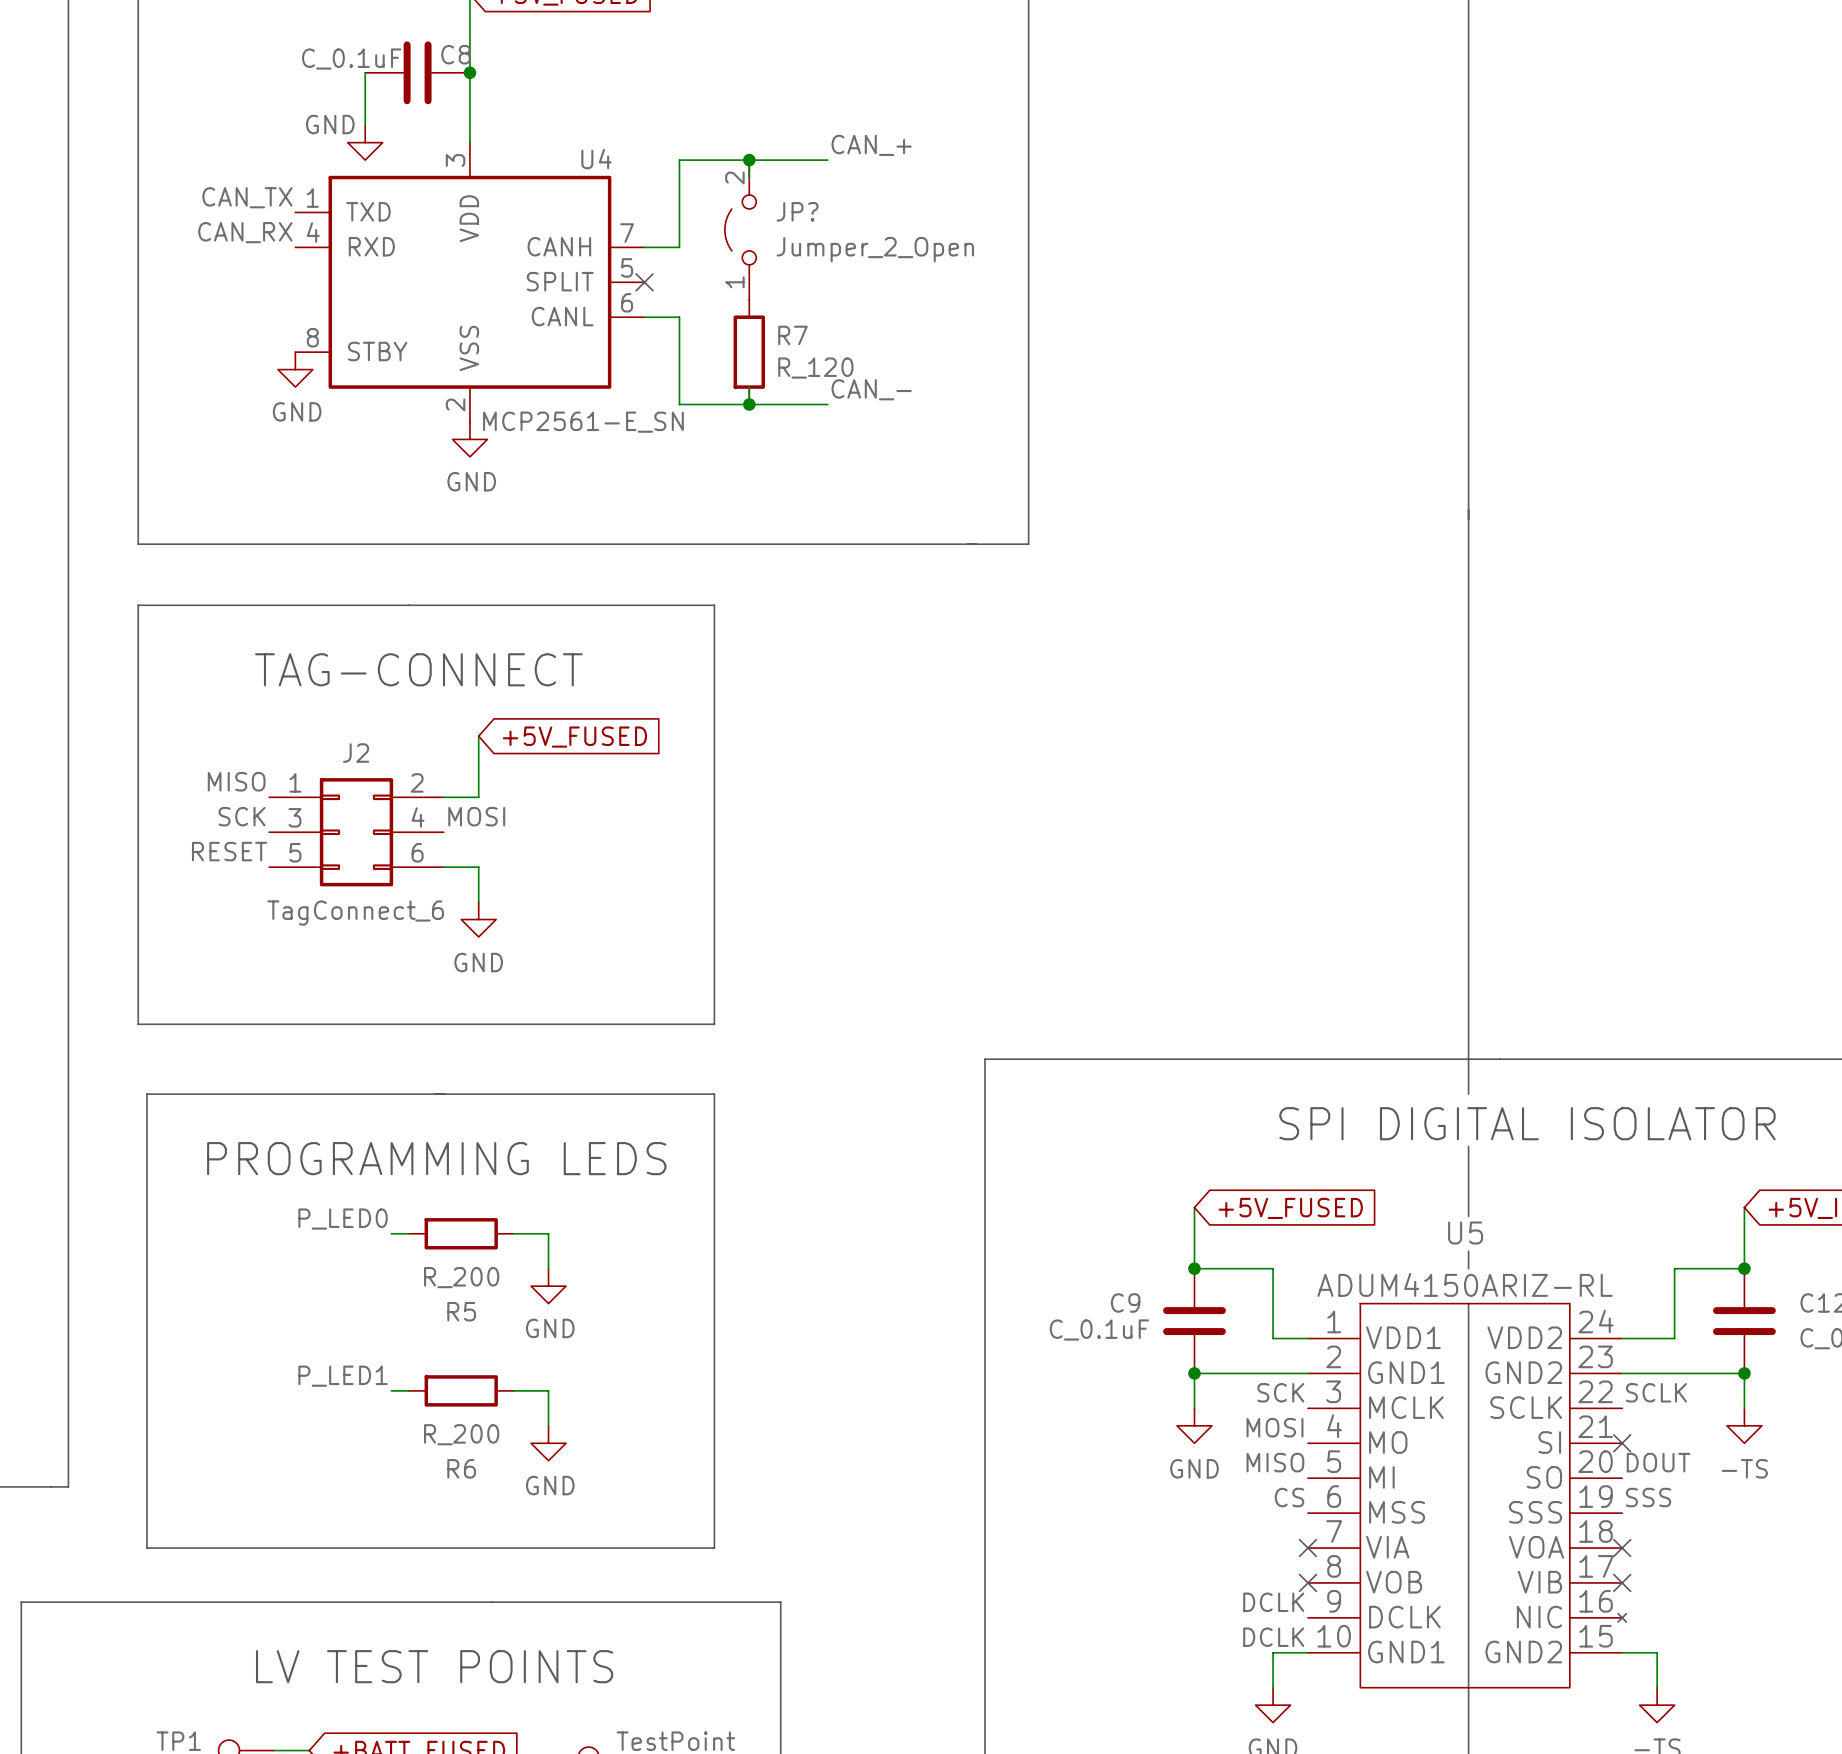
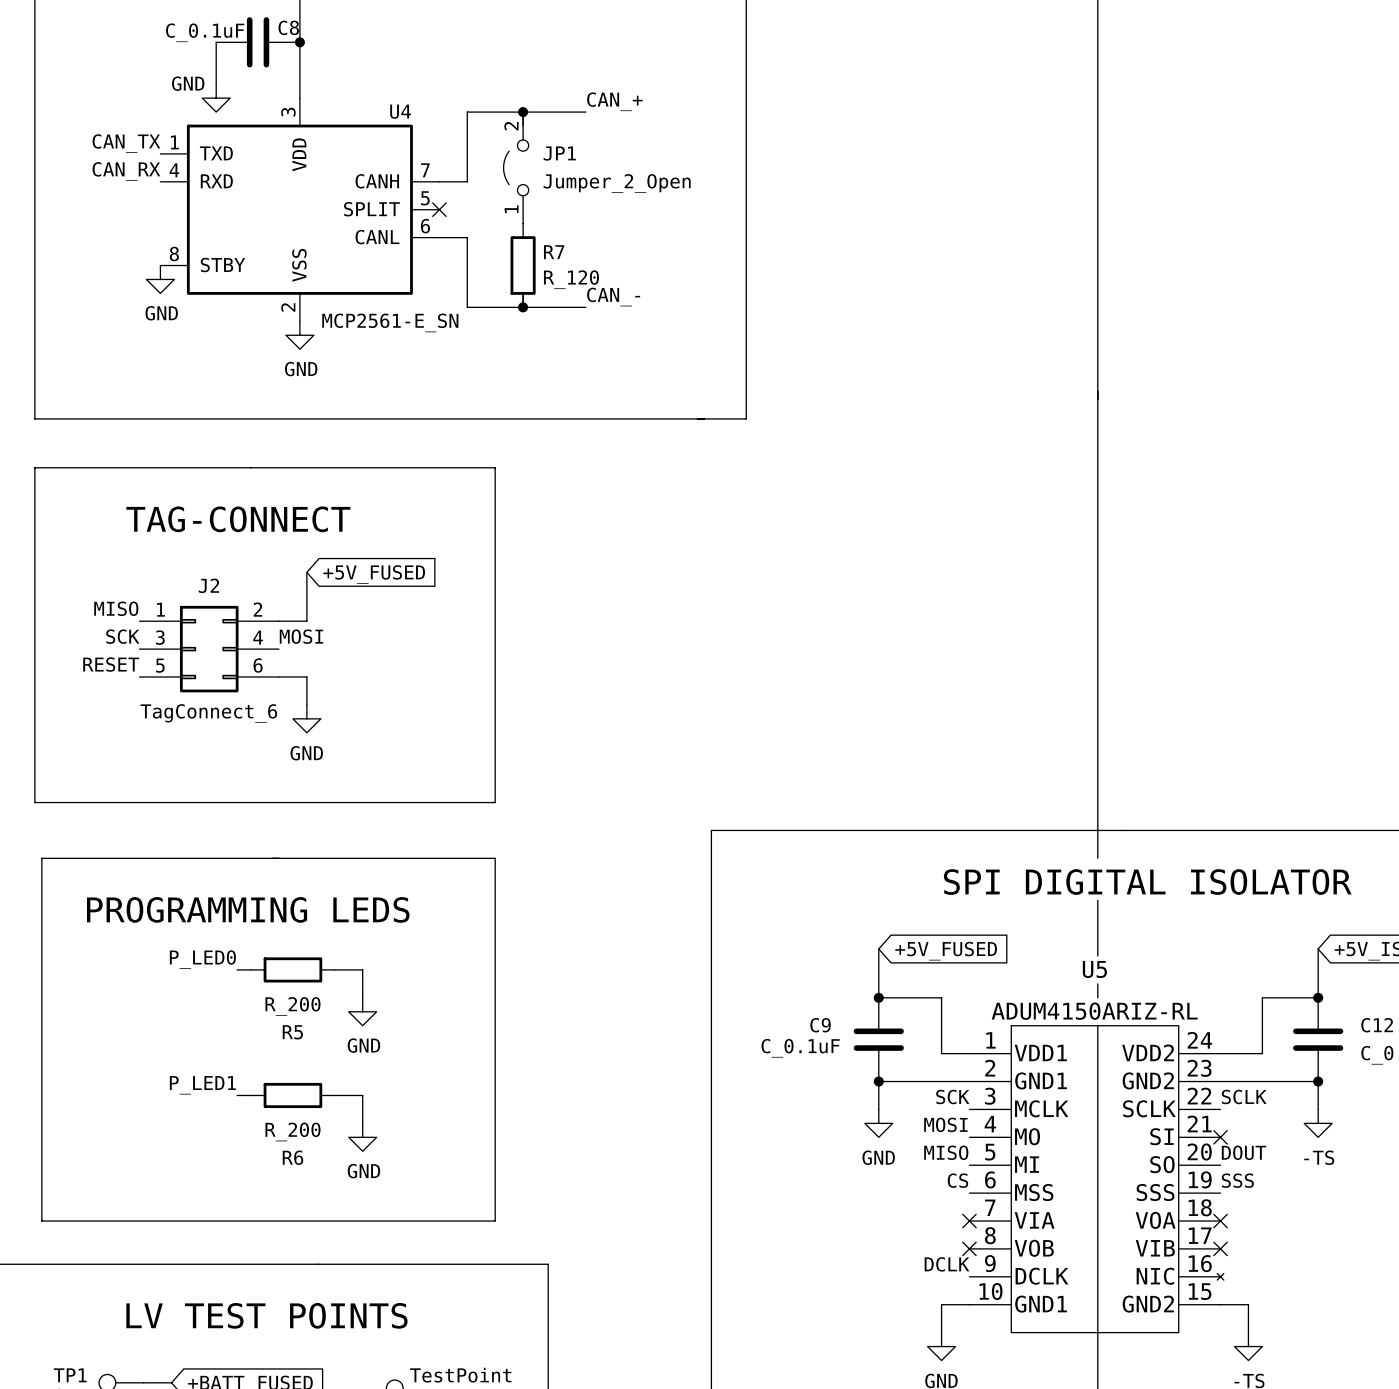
JP? name: JP? (797, 211) -> JP1 (559, 153)
label: DCLK (1273, 1637) -> none

